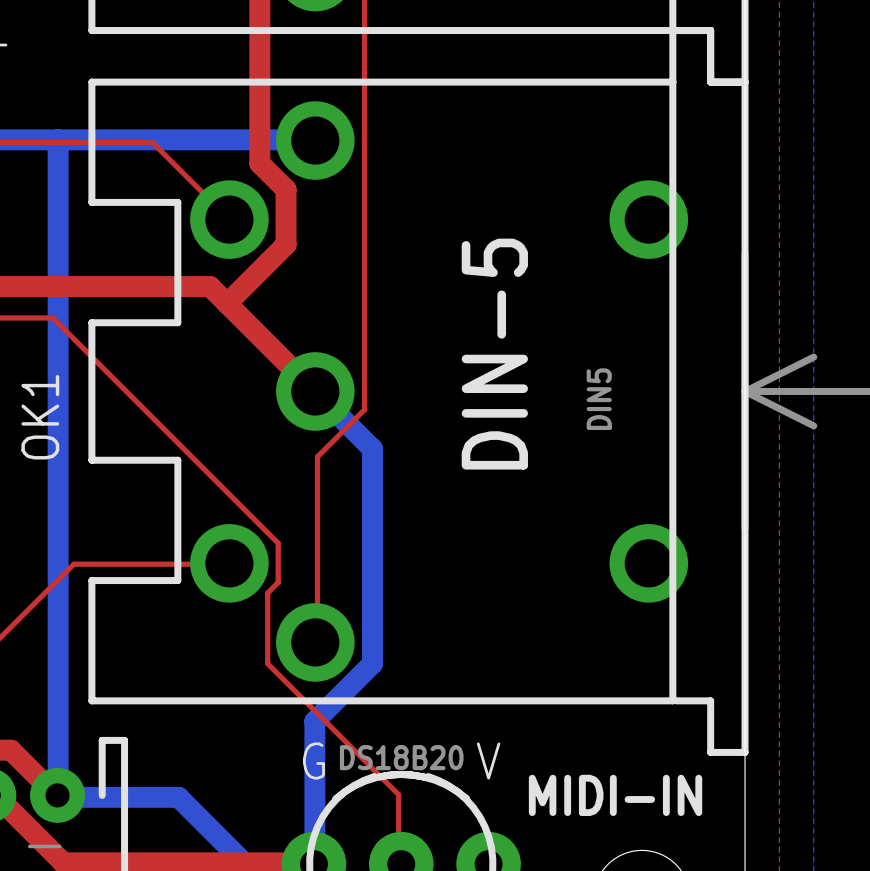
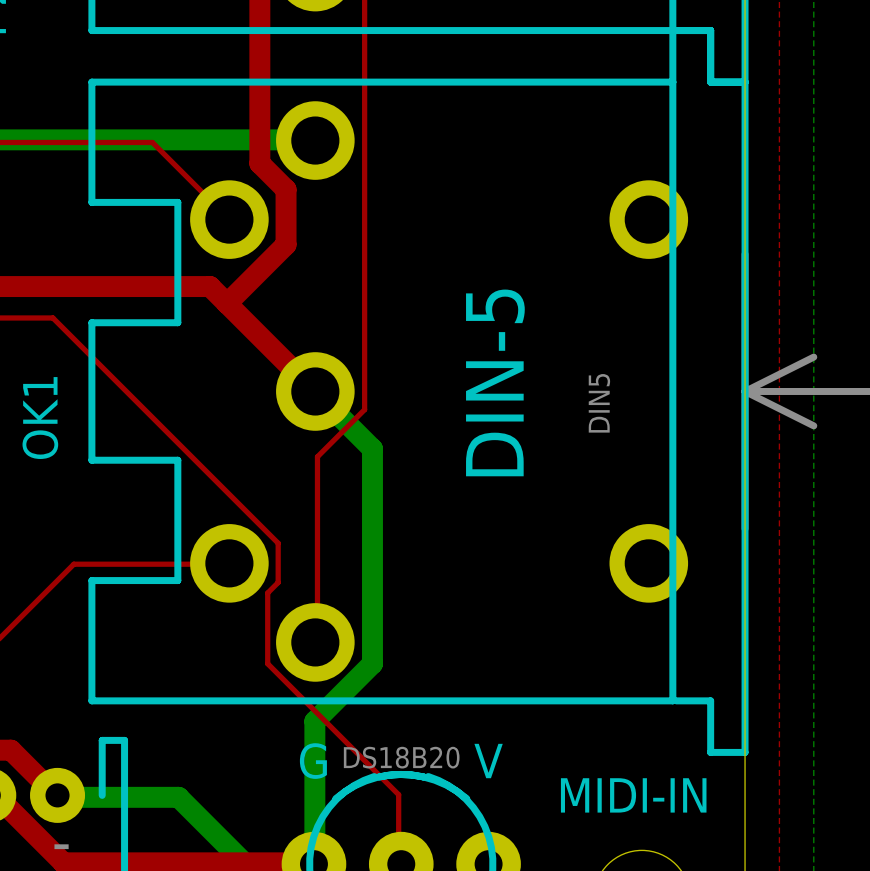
bottom track: (58, 139) (57, 795) -> none

